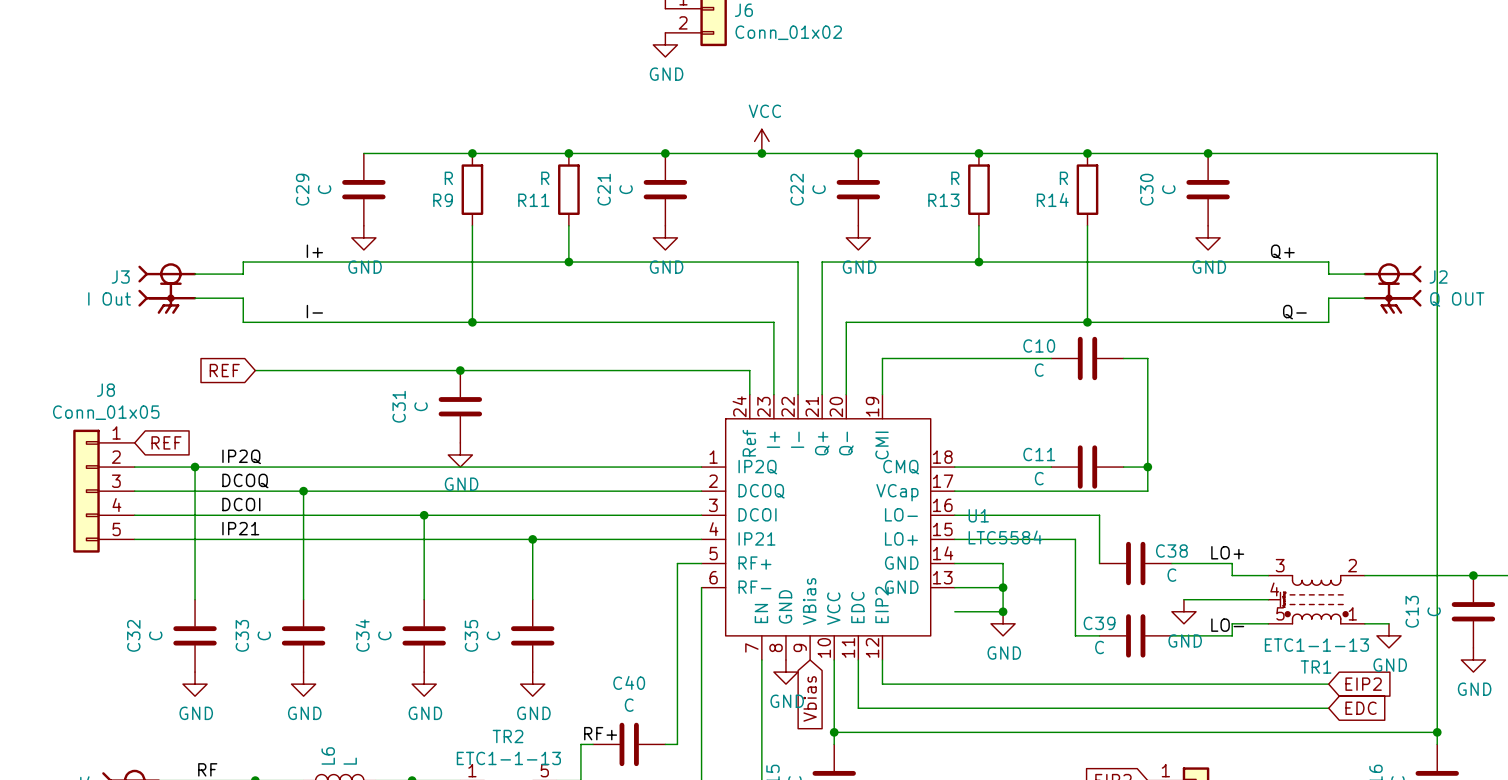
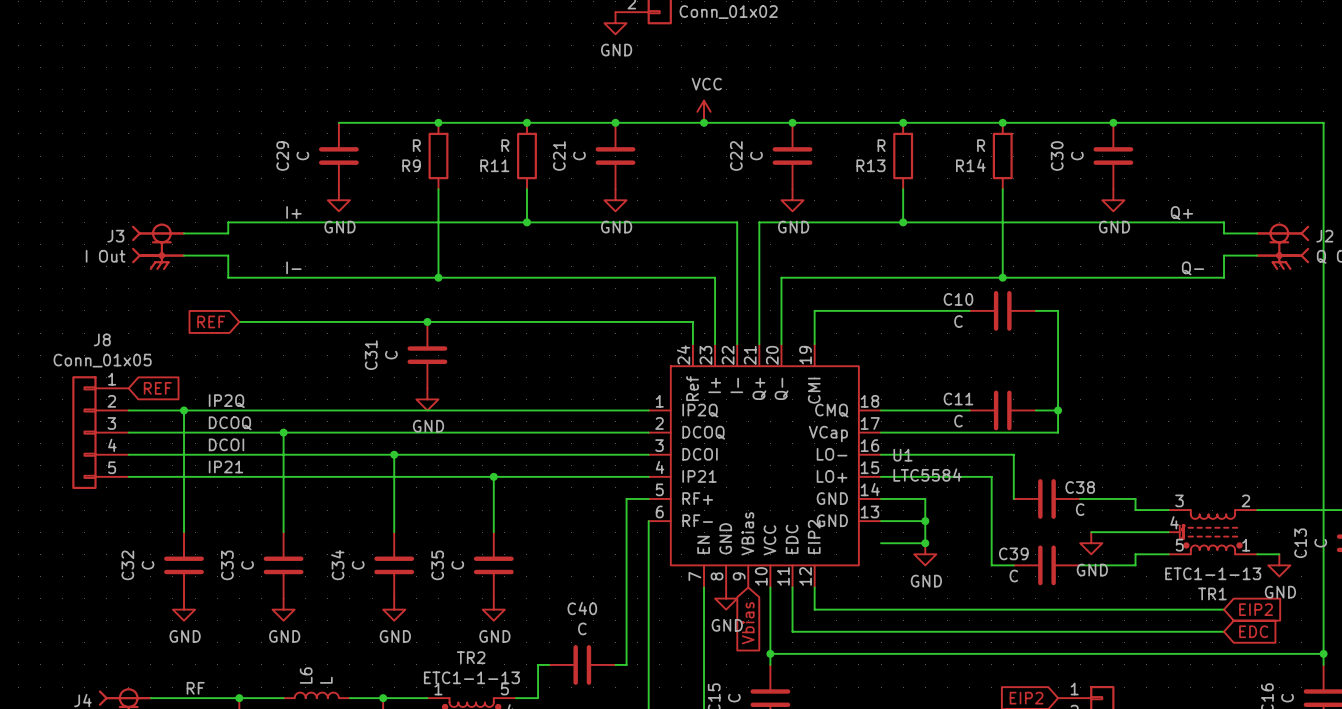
label: LO+ (1227, 552) -> none
label: LO- (1227, 625) -> none
label: RF+ (600, 733) -> none

